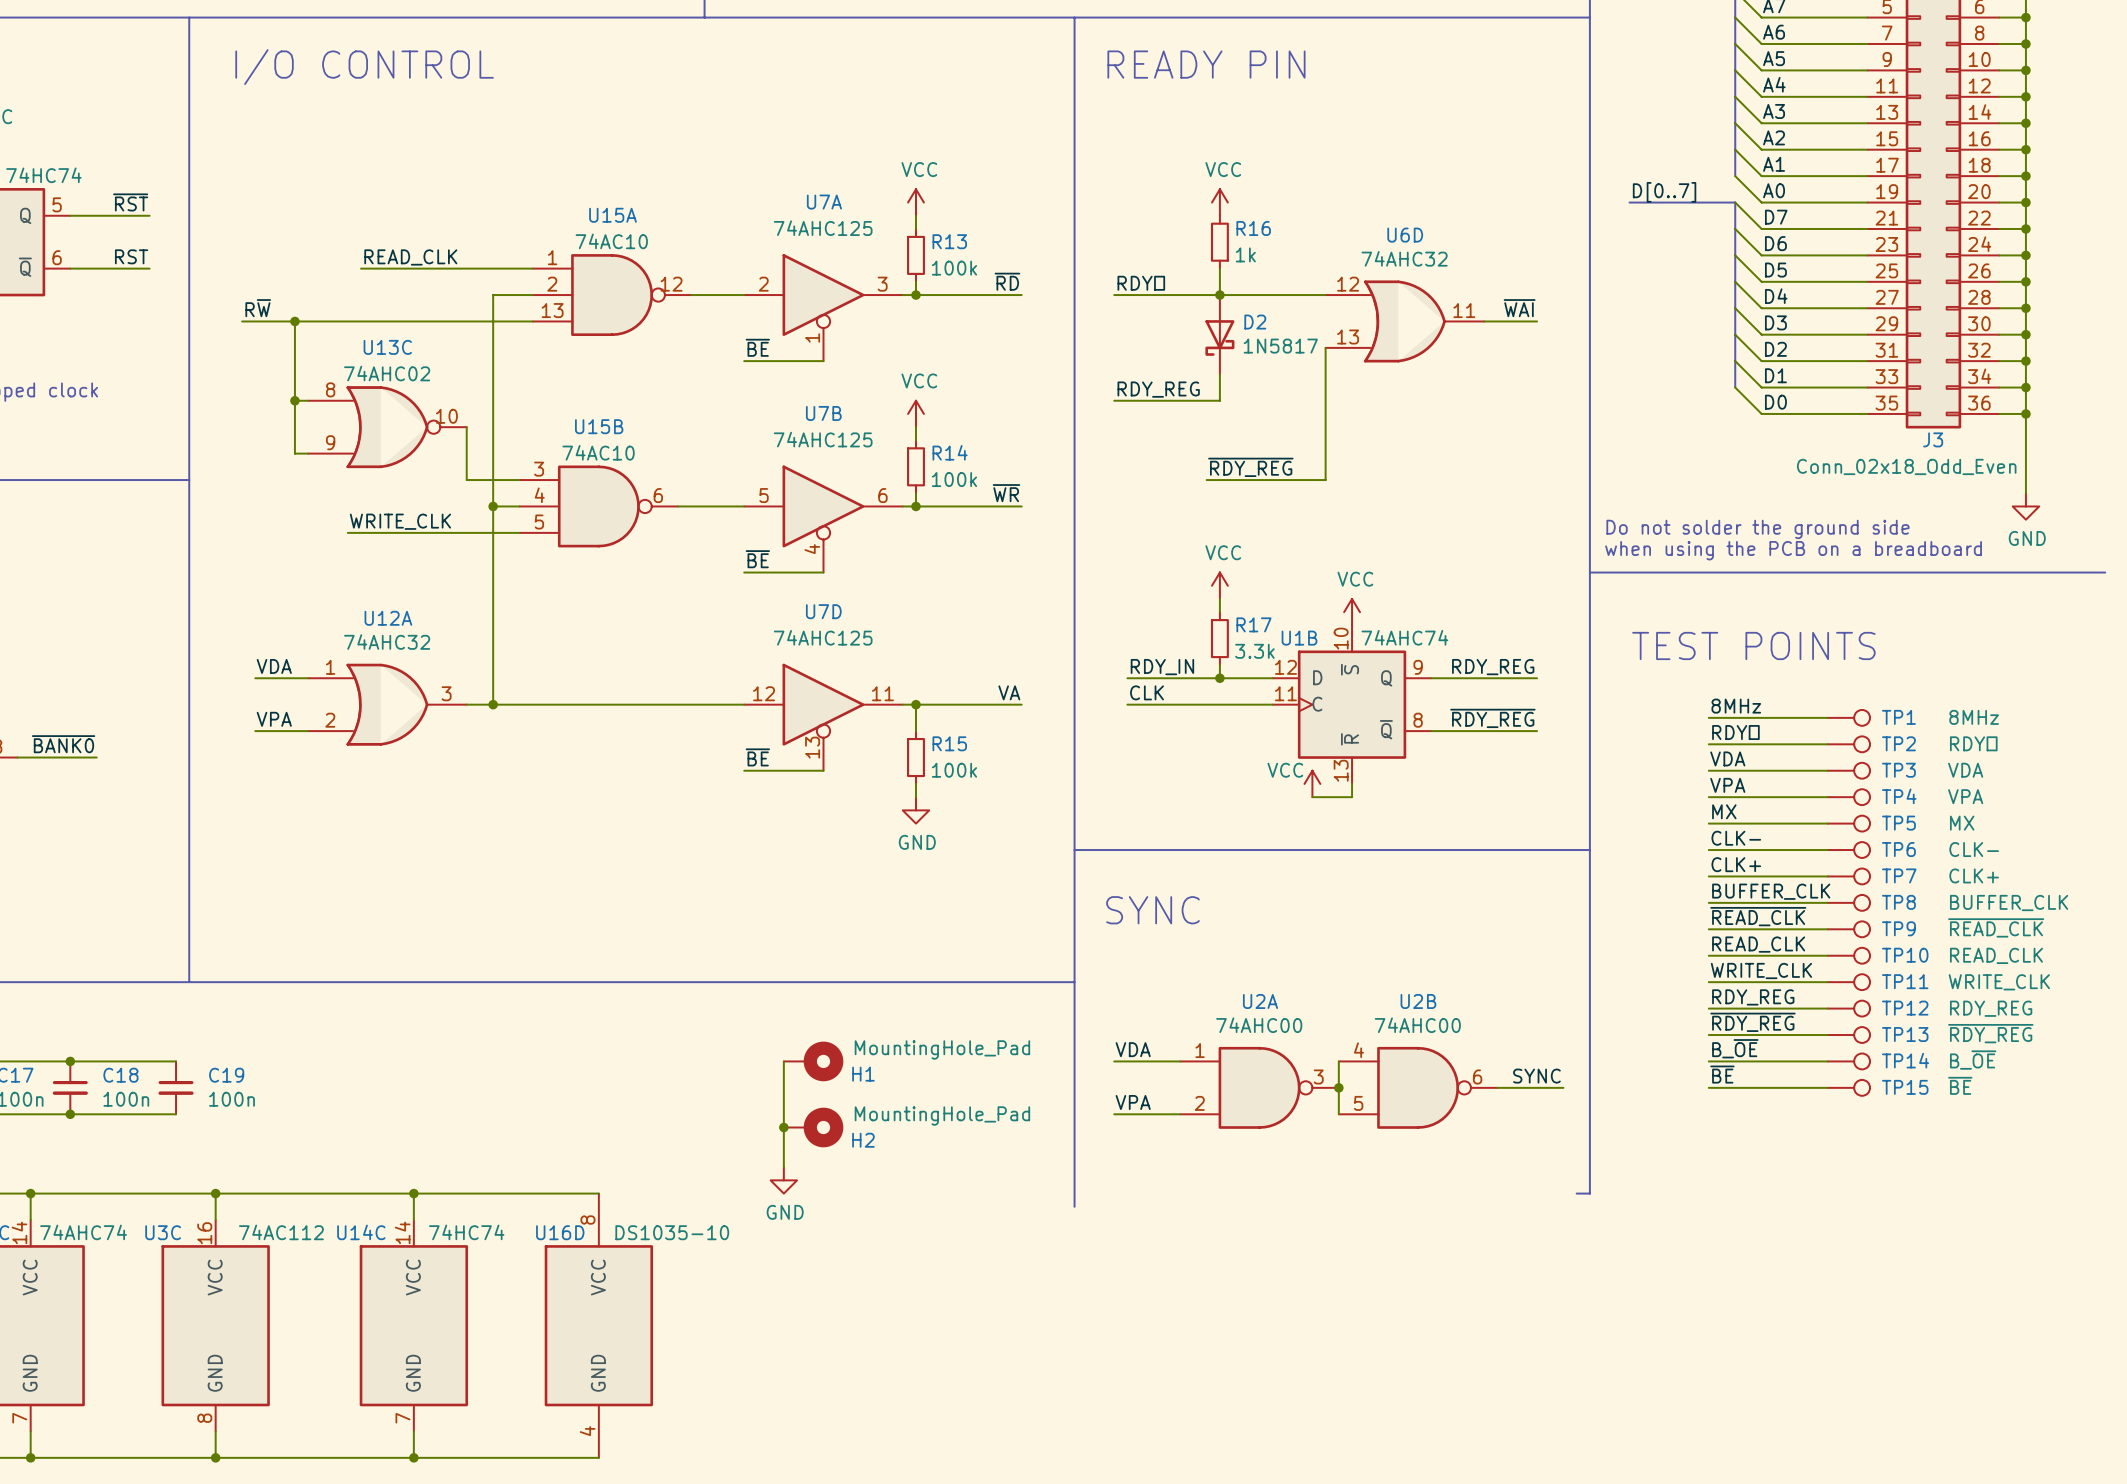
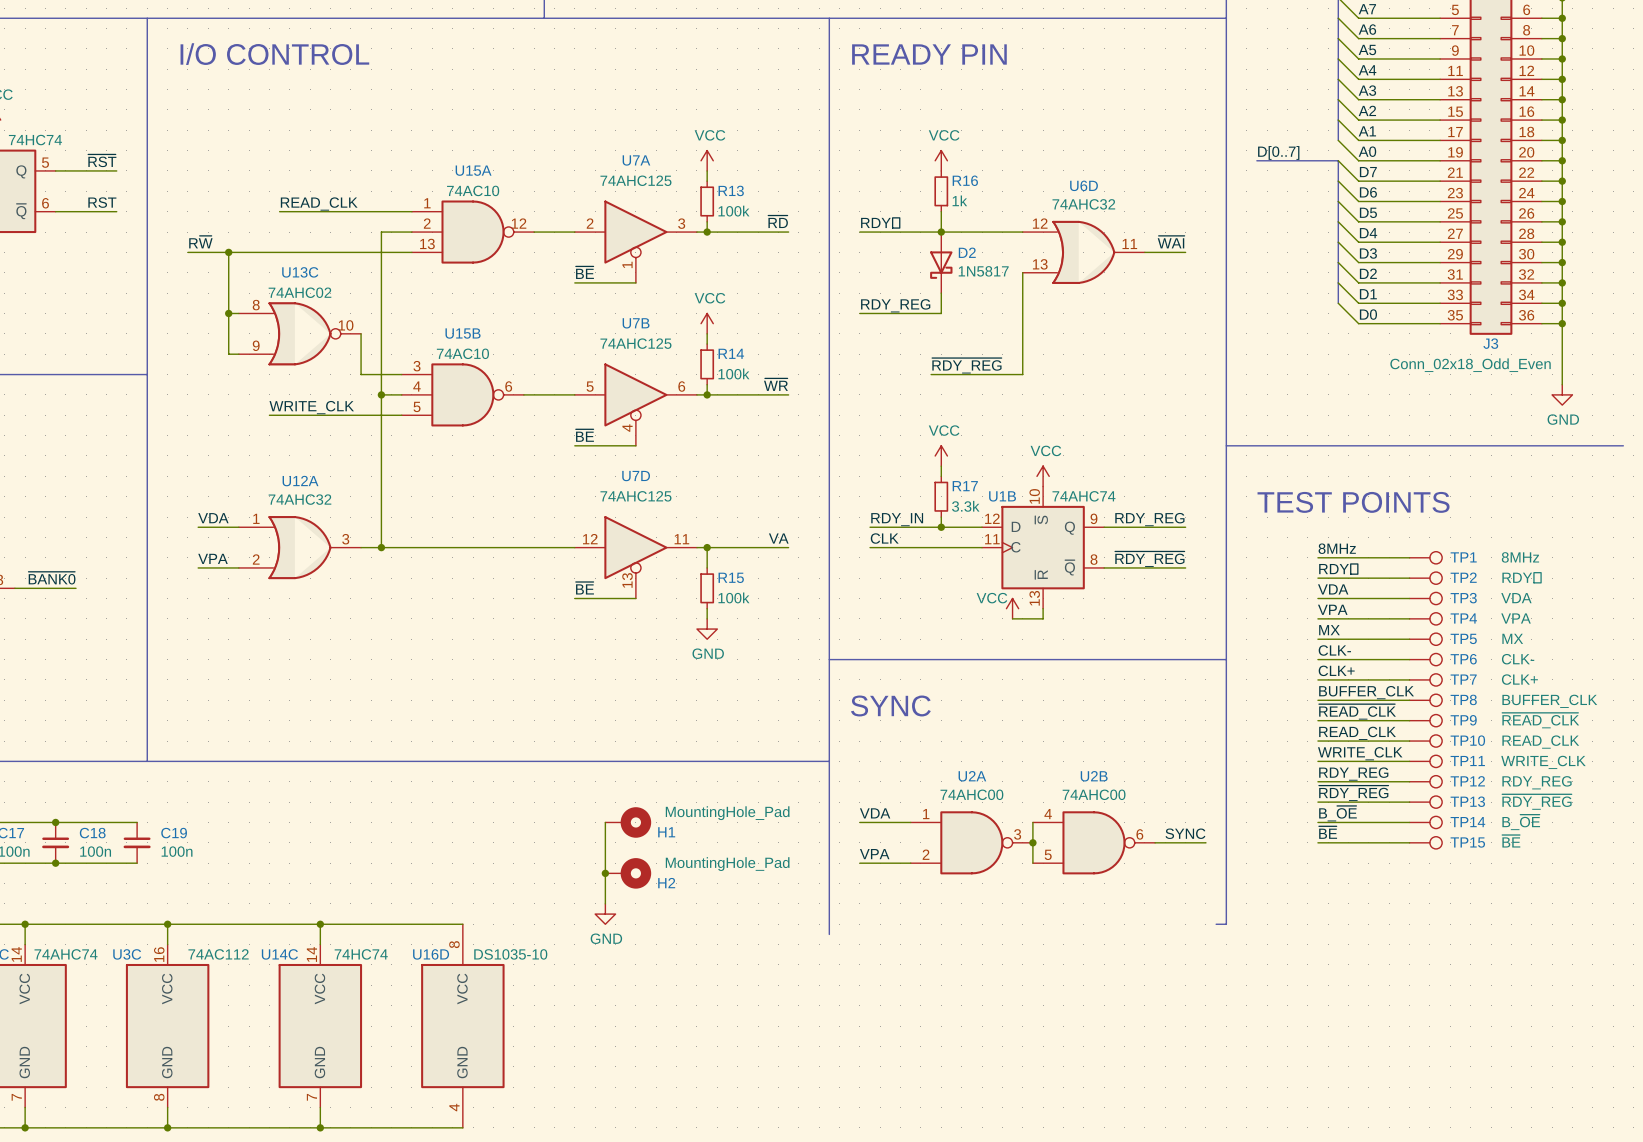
text: Do not solder the ground side (1757, 529) -> none
text: when using the PCB on a breadboard (1793, 550) -> none

